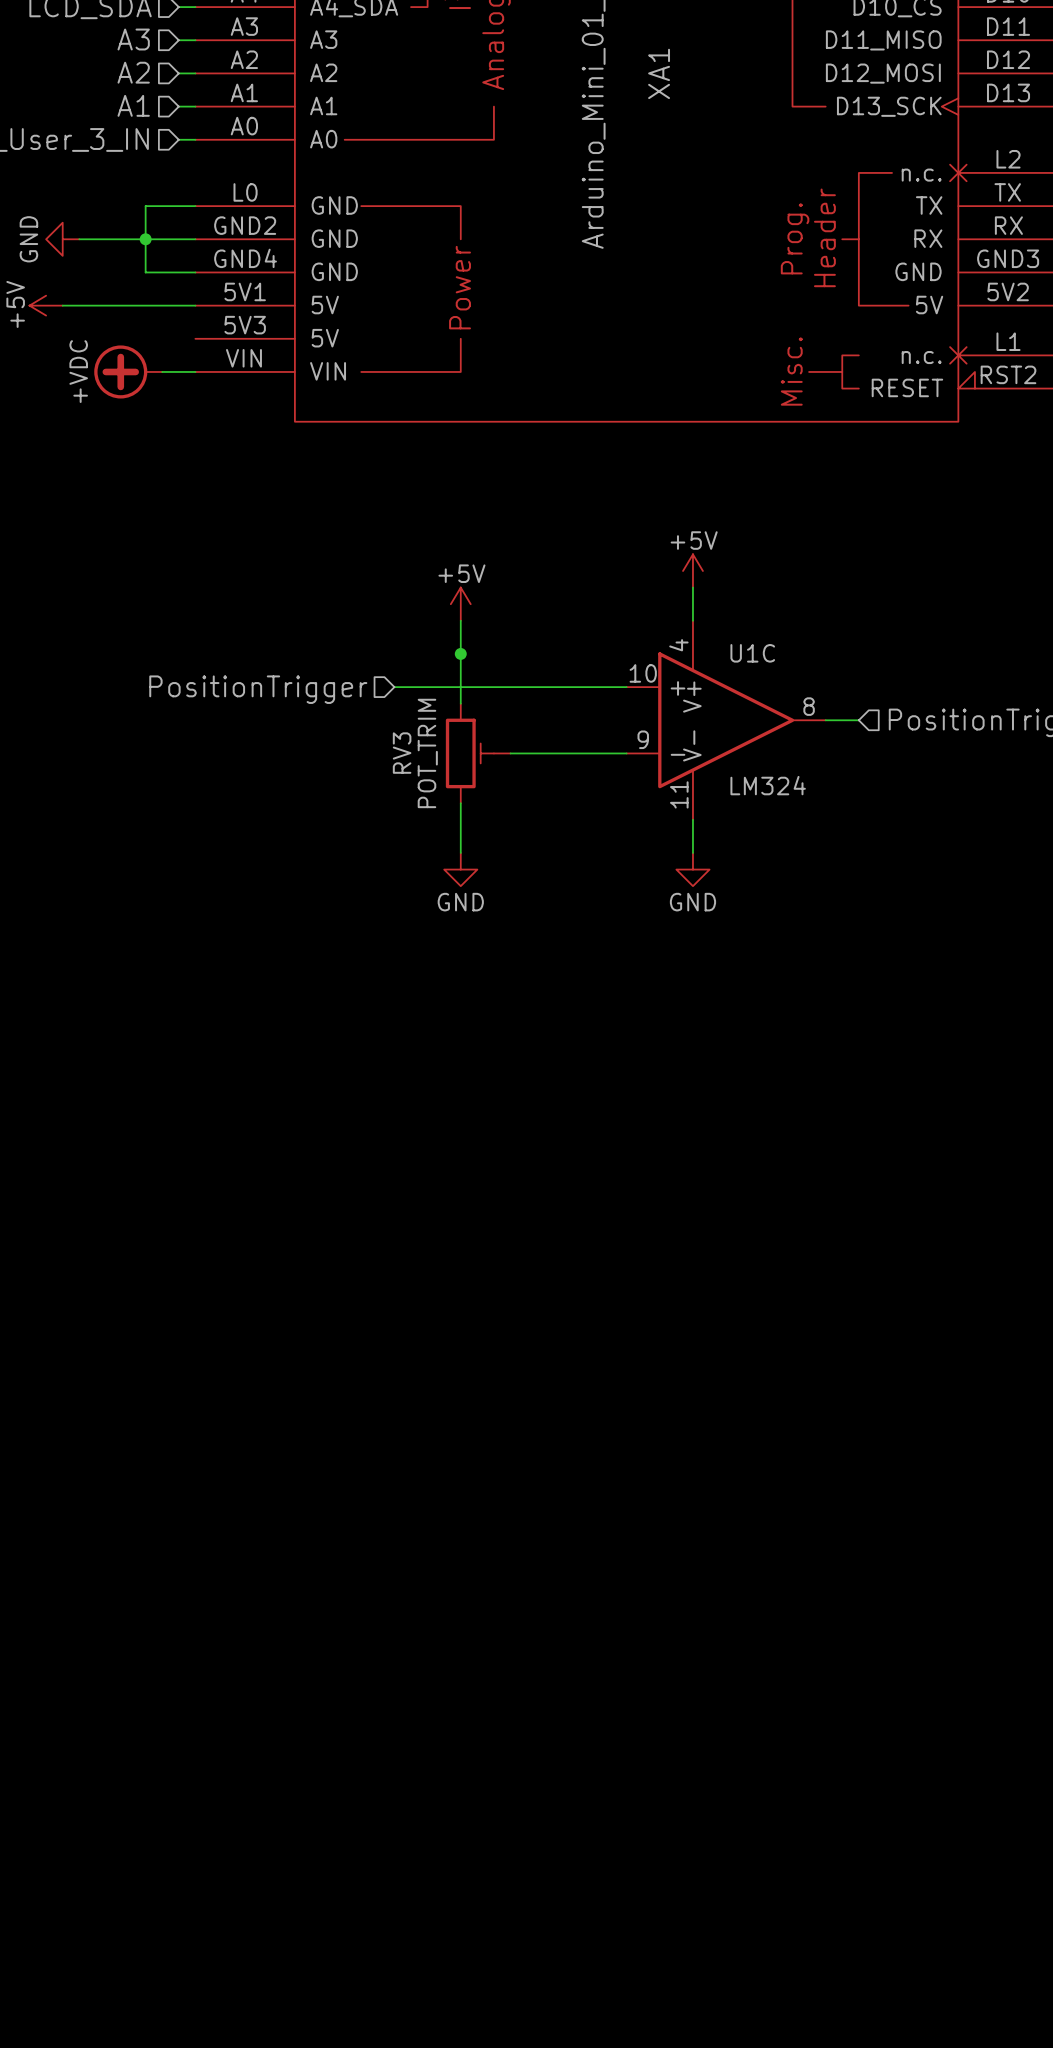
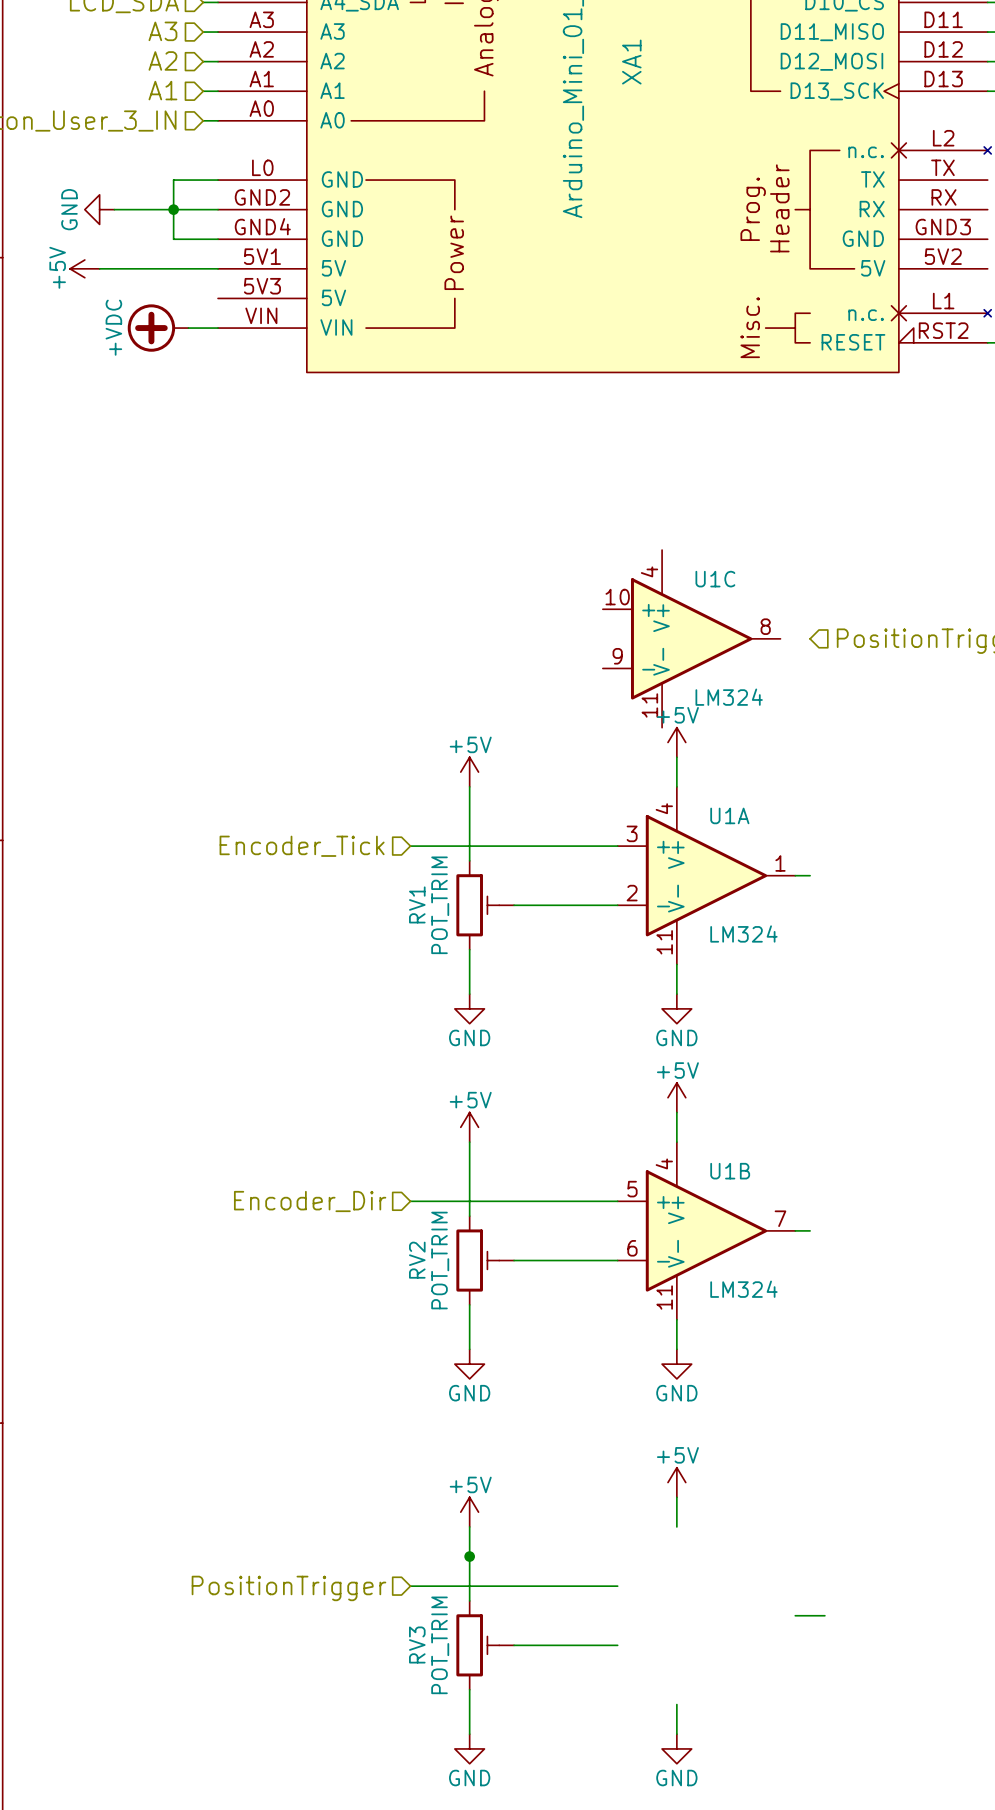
power symbol: +5V (692, 571) -> none
wire: (692, 587) (692, 620) -> (676, 757) (676, 786)
power symbol: +5V (460, 604) -> none
wire: (460, 620) (460, 703) -> (469, 786) (469, 860)
junction: (460, 653) -> none
wire: (394, 687) (626, 687) -> (410, 846) (617, 846)
hierarchical label: PositionTrigger (258, 689) -> none
wire: (825, 720) (858, 720) -> none
RV3 position: (478, 753) -> (485, 1645)
wire: (510, 753) (626, 753) -> (514, 905) (617, 905)
wire: (460, 803) (460, 852) -> (469, 949) (469, 994)
wire: (692, 819) (692, 852) -> (676, 964) (676, 994)
power symbol: none -> +5V (676, 742)
power symbol: GND (460, 869) -> none
power symbol: none -> +5V (469, 772)
power symbol: GND (692, 869) -> none
hierarchical label: none -> Encoder_Tick (302, 846)
U1A: none -> LM324 (706, 875)
wire: none -> (795, 875) (810, 875)
RV1: none -> POT_TRIM (485, 905)
power symbol: none -> GND (469, 1008)
power symbol: none -> GND (676, 1008)
power symbol: none -> +5V (676, 1097)
wire: none -> (676, 1112) (676, 1142)
power symbol: none -> +5V (469, 1127)
wire: none -> (469, 1142) (469, 1216)
hierarchical label: none -> Encoder_Dir (310, 1201)
wire: none -> (410, 1201) (617, 1201)
U1B: none -> LM324 (706, 1230)
wire: none -> (795, 1230) (810, 1230)
RV2: none -> POT_TRIM (485, 1260)
wire: none -> (514, 1260) (617, 1260)
wire: none -> (469, 1304) (469, 1349)
wire: none -> (676, 1319) (676, 1349)
power symbol: none -> GND (469, 1364)
power symbol: none -> GND (676, 1364)
power symbol: none -> +5V (676, 1482)
wire: none -> (676, 1497) (676, 1526)
power symbol: none -> +5V (469, 1512)
wire: none -> (469, 1526) (469, 1600)
junction: none -> (469, 1556)
wire: none -> (410, 1586) (617, 1586)
hierarchical label: none -> PositionTrigger (288, 1588)
wire: none -> (795, 1615) (824, 1615)
wire: none -> (514, 1645) (617, 1645)
wire: none -> (469, 1689) (469, 1734)
wire: none -> (676, 1704) (676, 1734)
power symbol: none -> GND (469, 1748)
power symbol: none -> GND (676, 1748)

